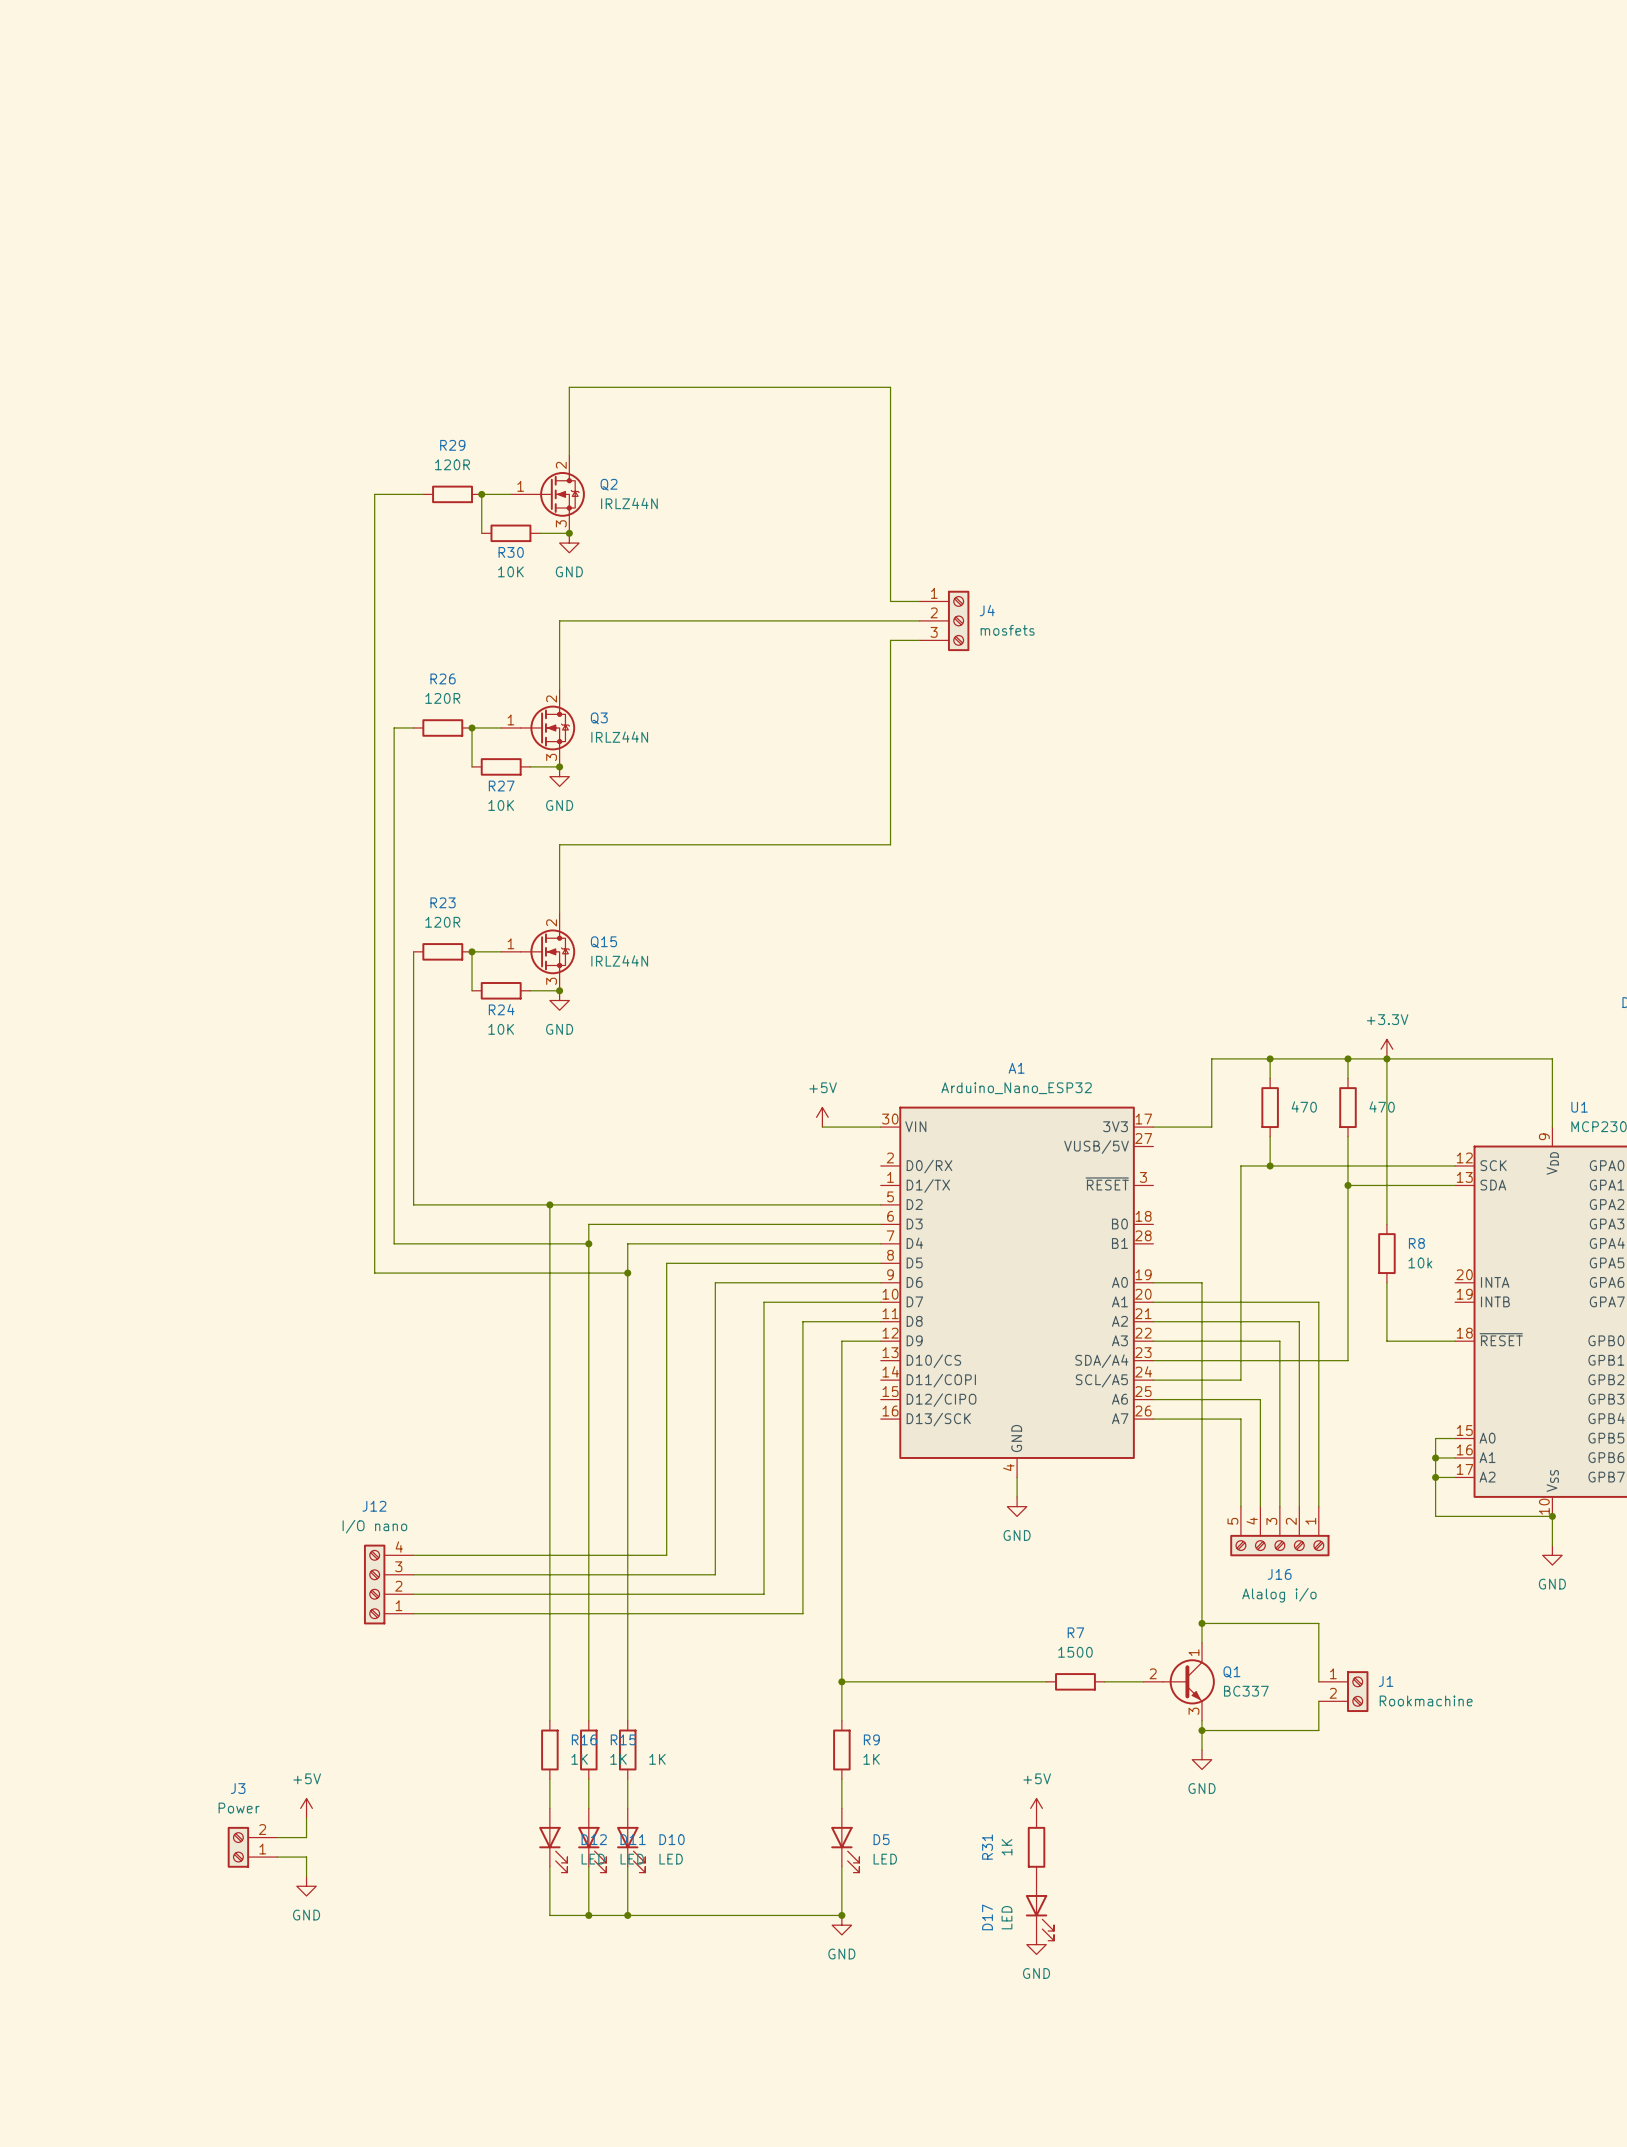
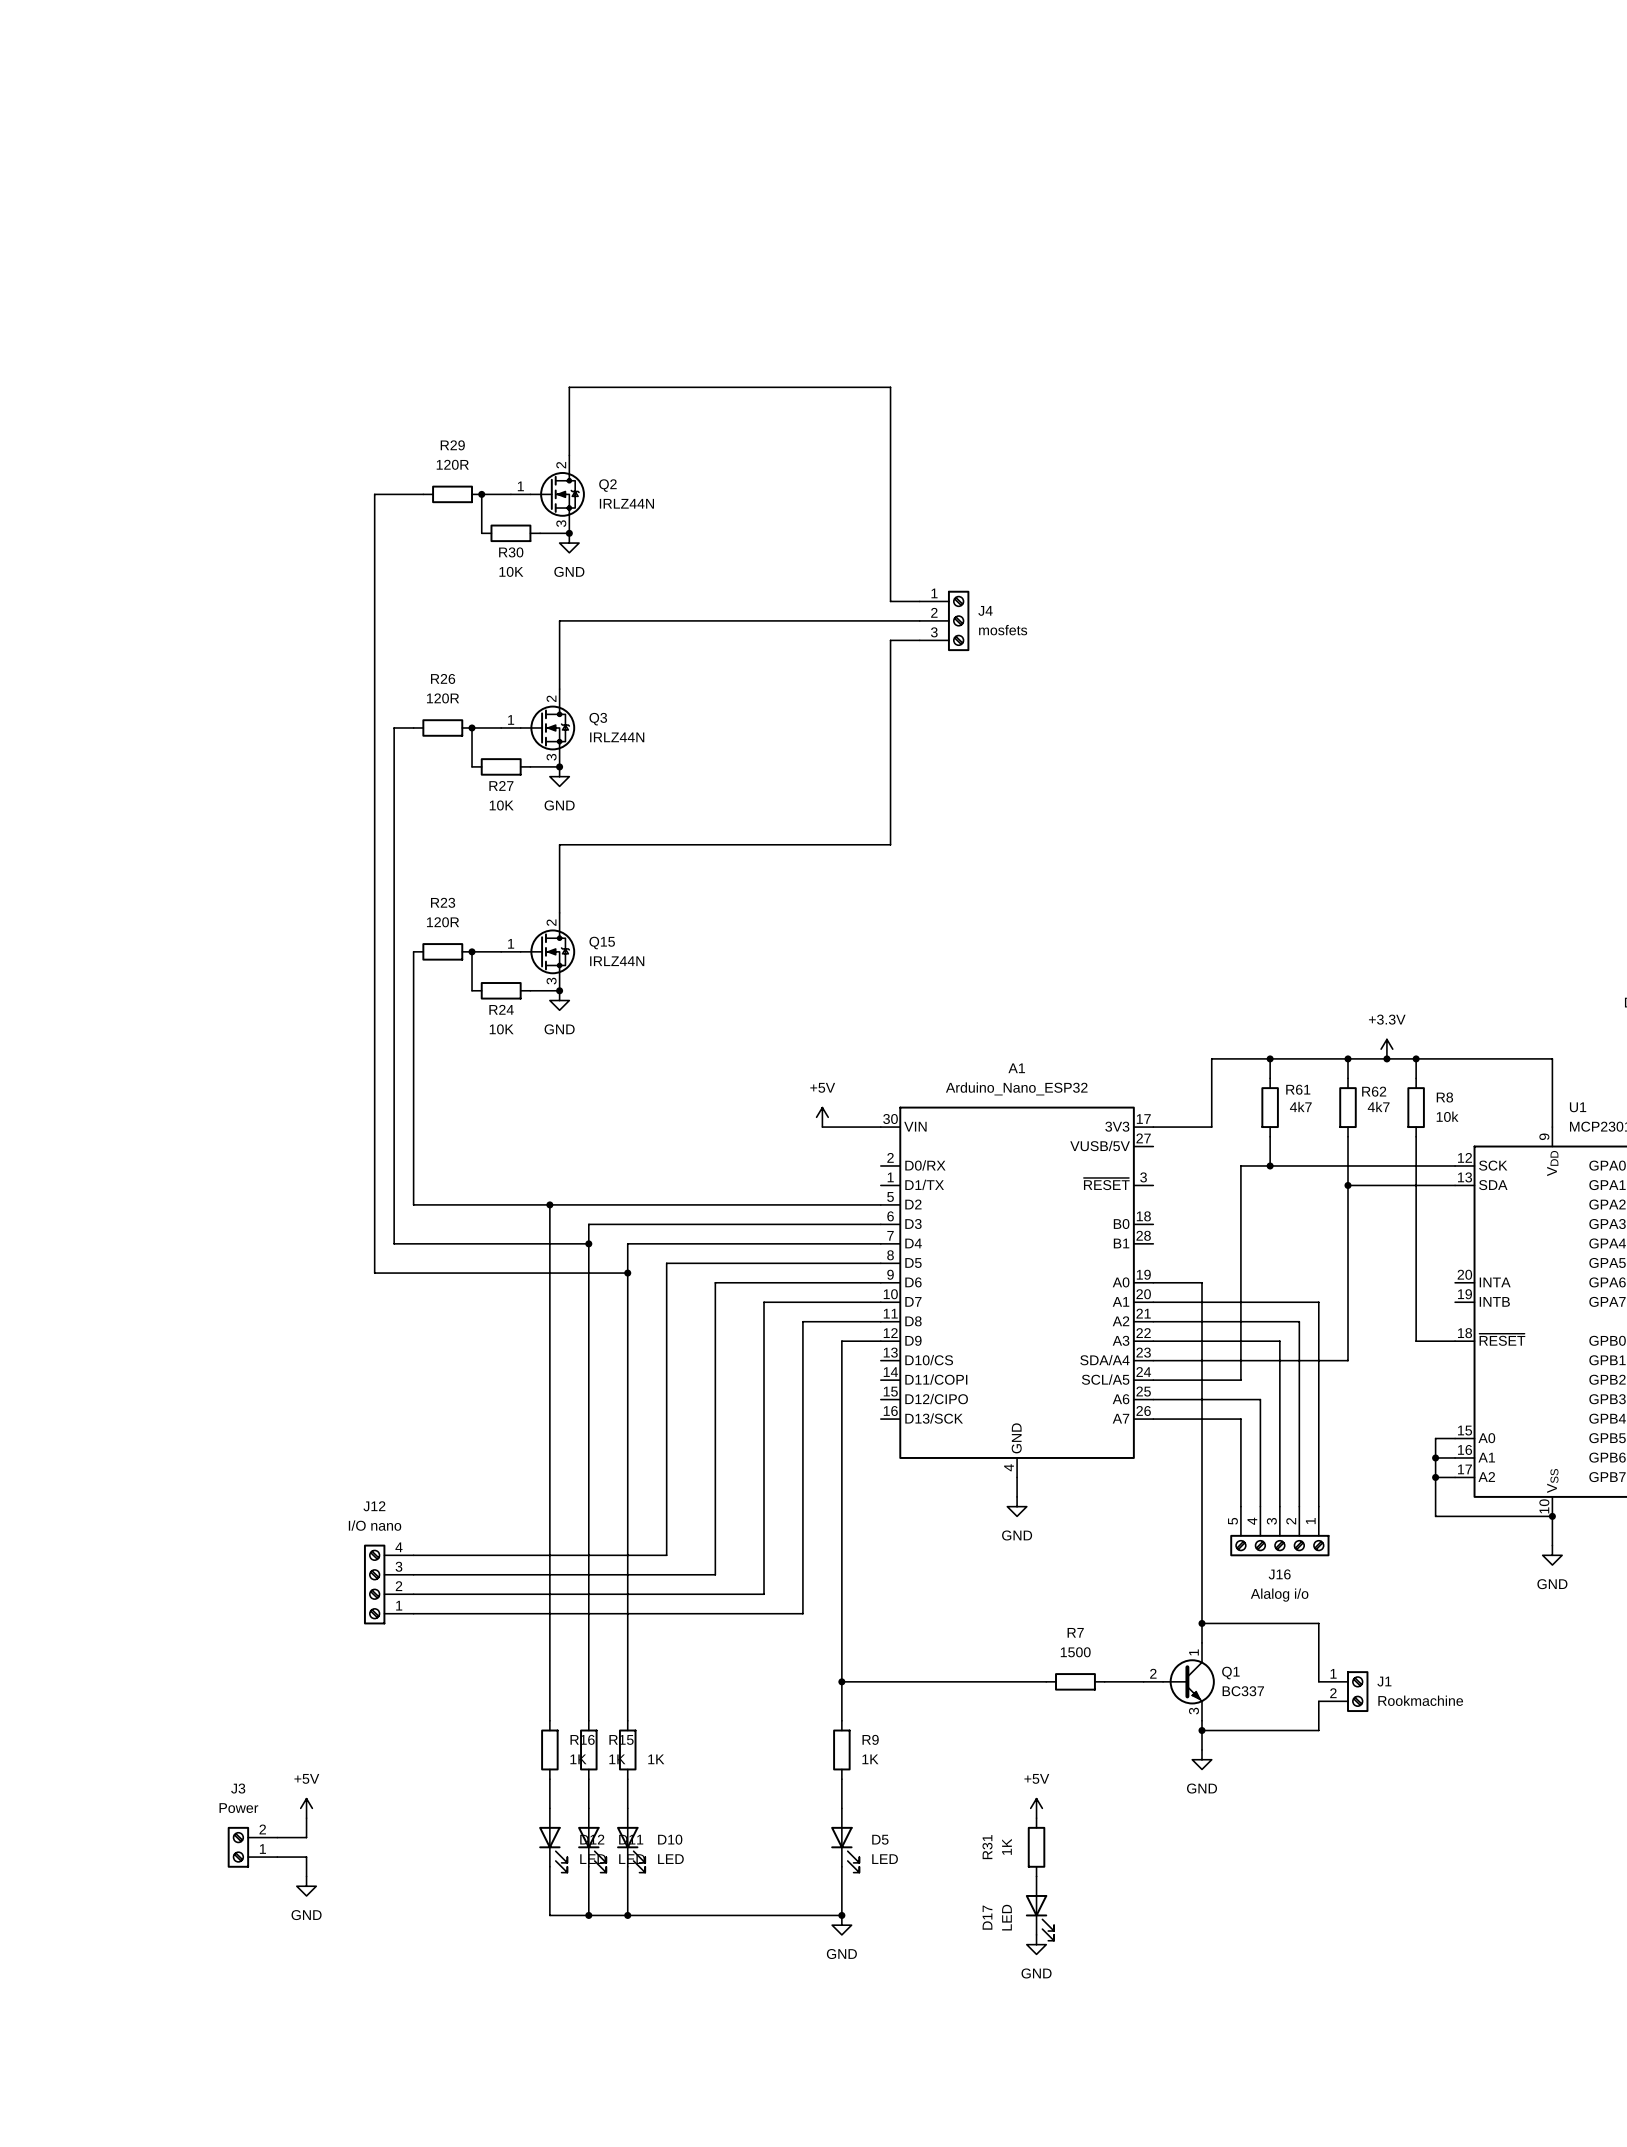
wire: (1386, 1058) (1386, 1224) -> none
wire: none -> (1416, 1058) (1416, 1078)
junction: none -> (1416, 1058)
R61 name: none -> R61 (1298, 1089)
R62 name: none -> R62 (1374, 1091)
R61 value: 470 (1304, 1106) -> 4k7 (1300, 1106)
R62 value: 470 (1382, 1106) -> 4k7 (1378, 1106)
R8 position: (1386, 1253) -> (1416, 1107)
wire: (1386, 1282) (1386, 1341) (1416, 1341) -> (1416, 1136) (1416, 1341)

